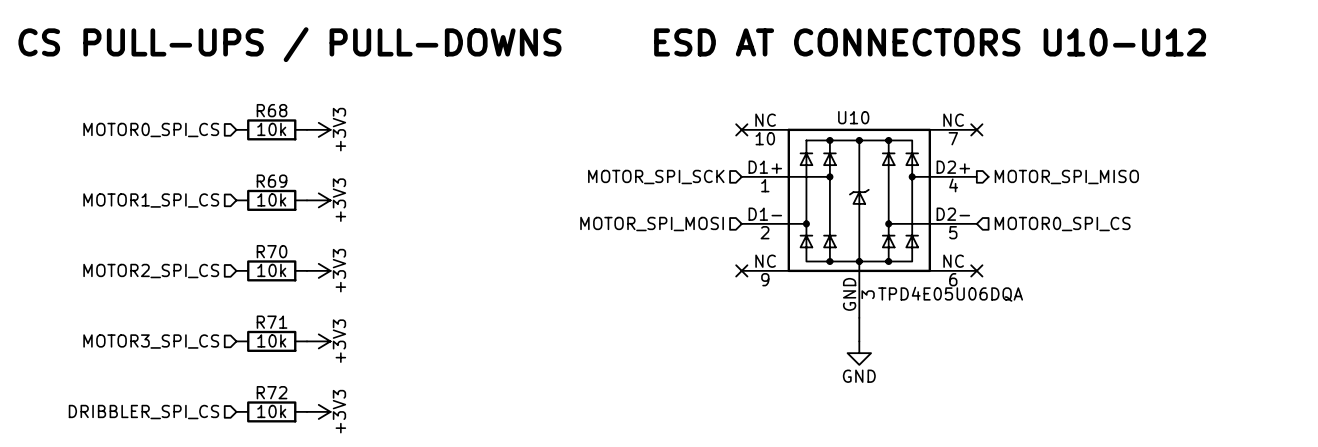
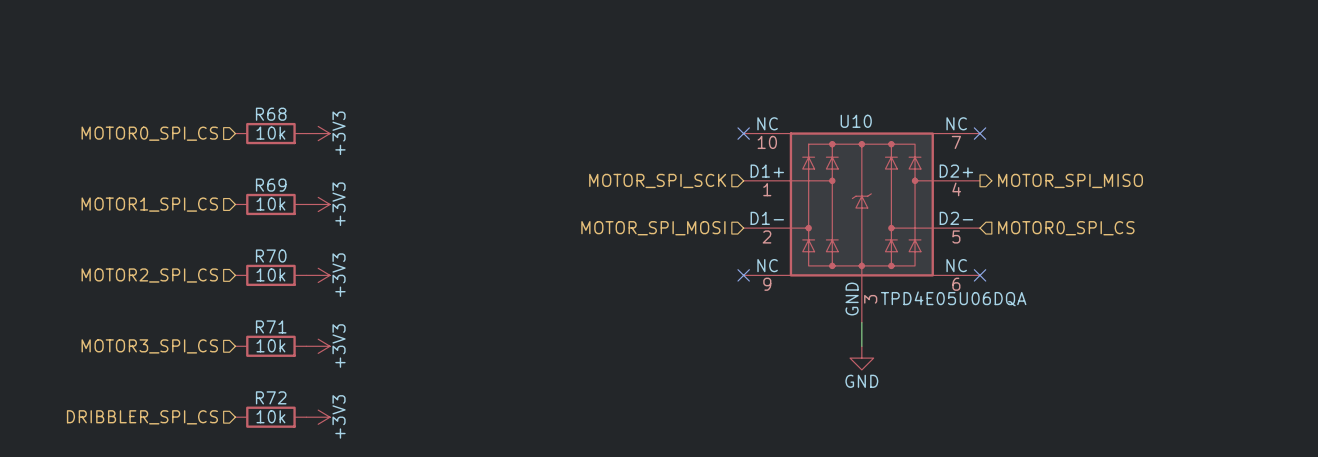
text: ESD AT CONNECTORS U10-U12 (930, 42) -> none
text: CS PULL-UPS / PULL-DOWNS (289, 44) -> none

